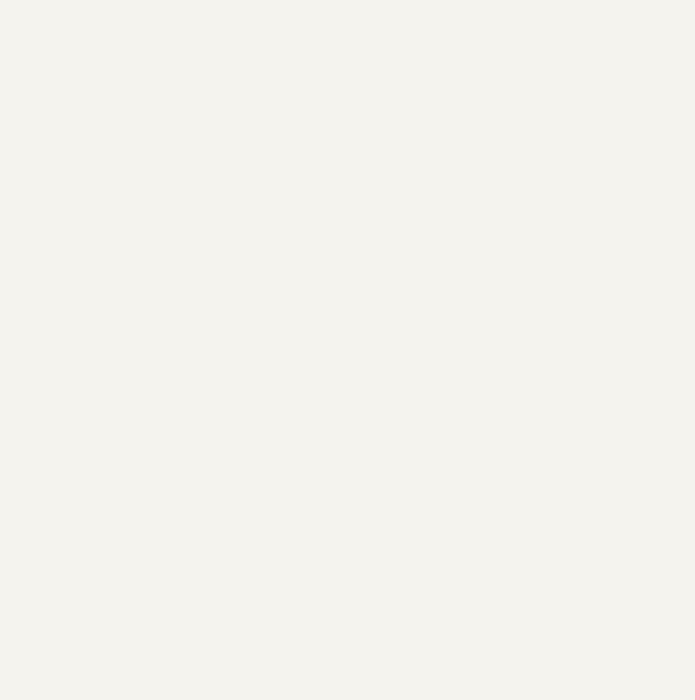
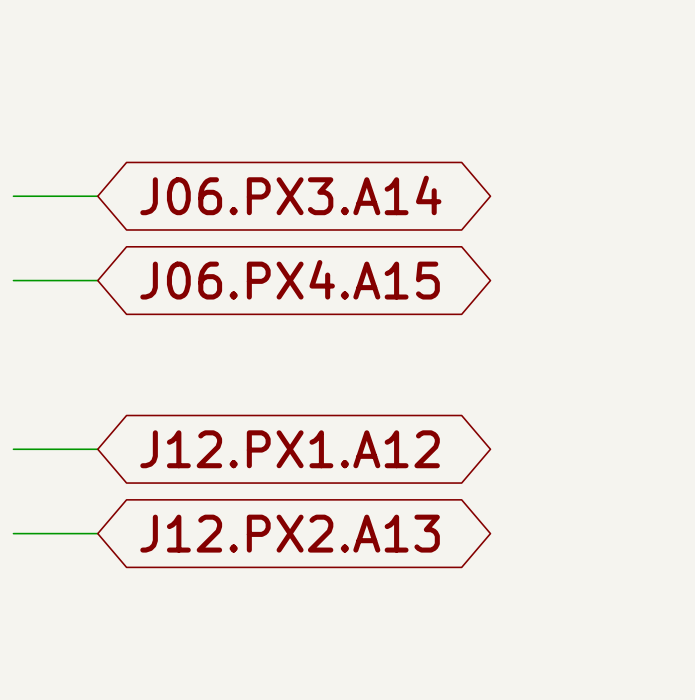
global label: none -> J06.PX3.A14 (290, 195)
wire: none -> (13, 196) (97, 196)
global label: none -> J06.PX4.A15 (290, 279)
wire: none -> (13, 280) (97, 280)
wire: none -> (13, 449) (97, 449)
global label: none -> J12.PX1.A12 (290, 449)
wire: none -> (13, 533) (97, 533)
global label: none -> J12.PX2.A13 (290, 533)

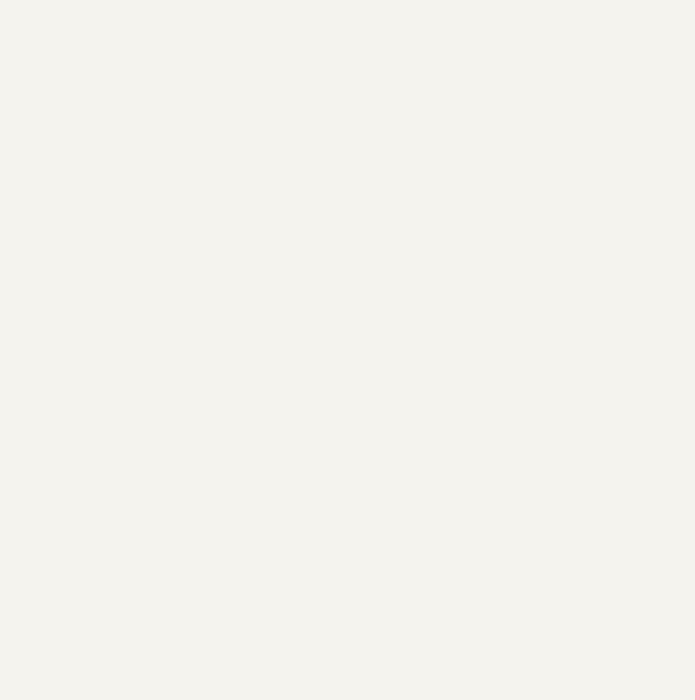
global label: J06.PX3.A14 (290, 195) -> none
wire: (13, 196) (97, 196) -> none
global label: J06.PX4.A15 (290, 279) -> none
wire: (13, 280) (97, 280) -> none
wire: (13, 449) (97, 449) -> none
global label: J12.PX1.A12 (290, 449) -> none
wire: (13, 533) (97, 533) -> none
global label: J12.PX2.A13 (290, 533) -> none

